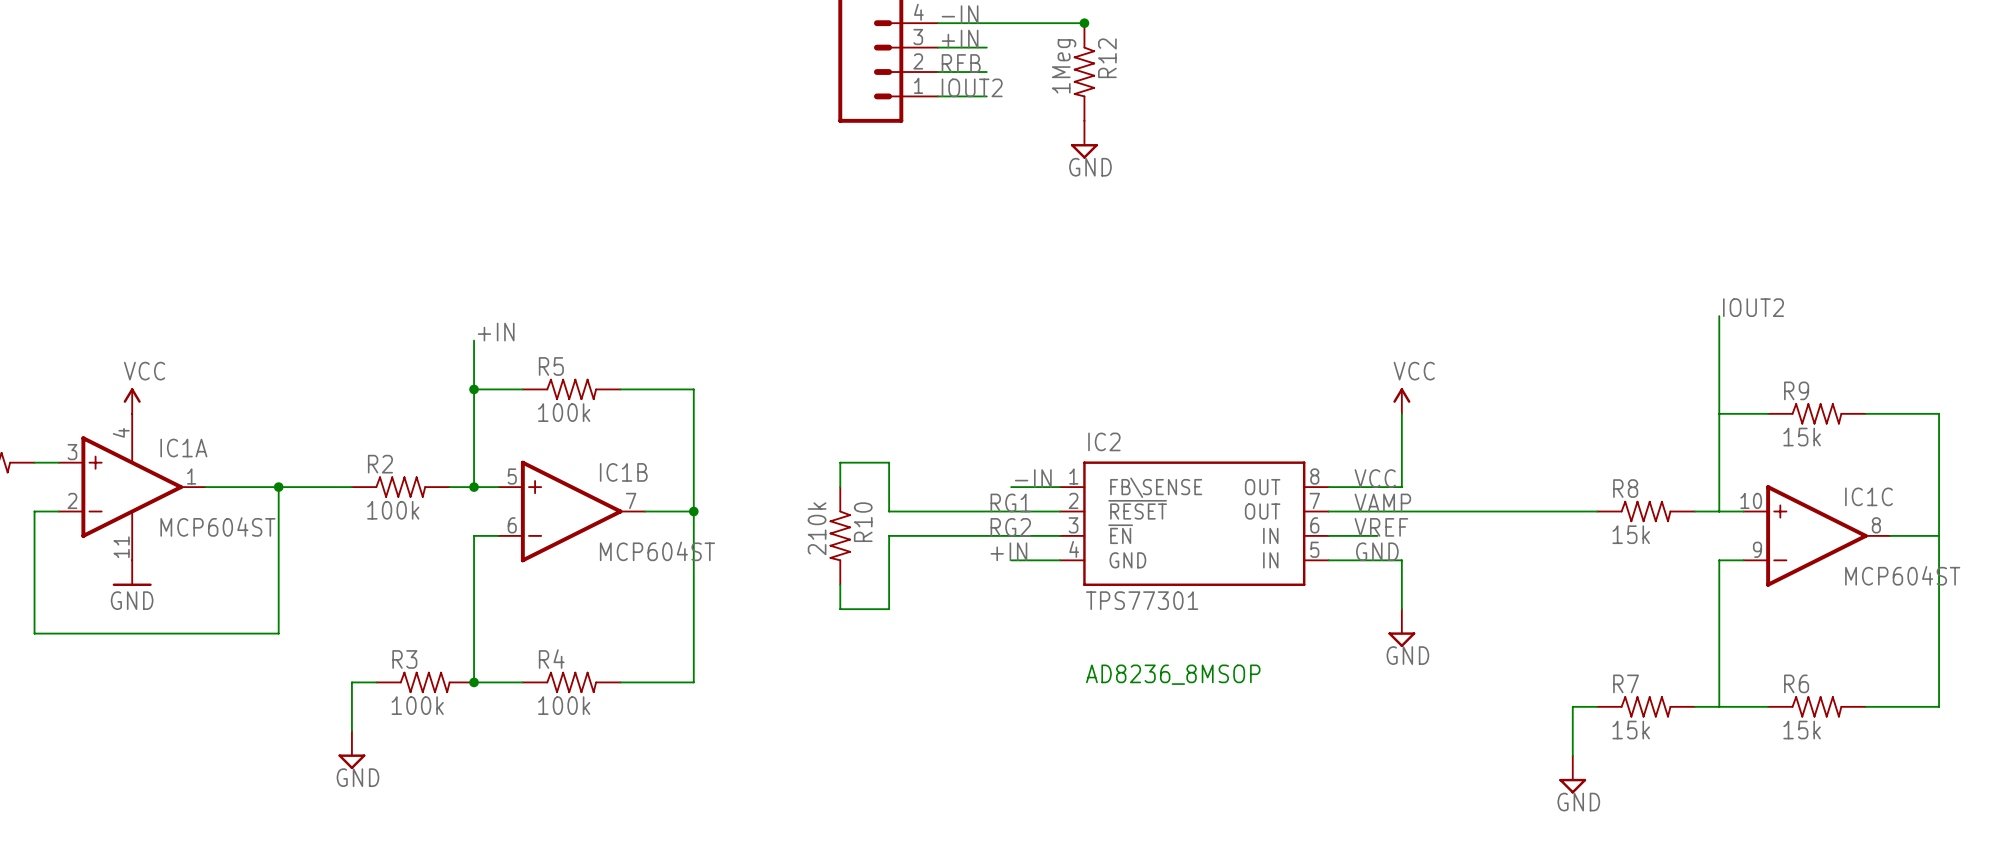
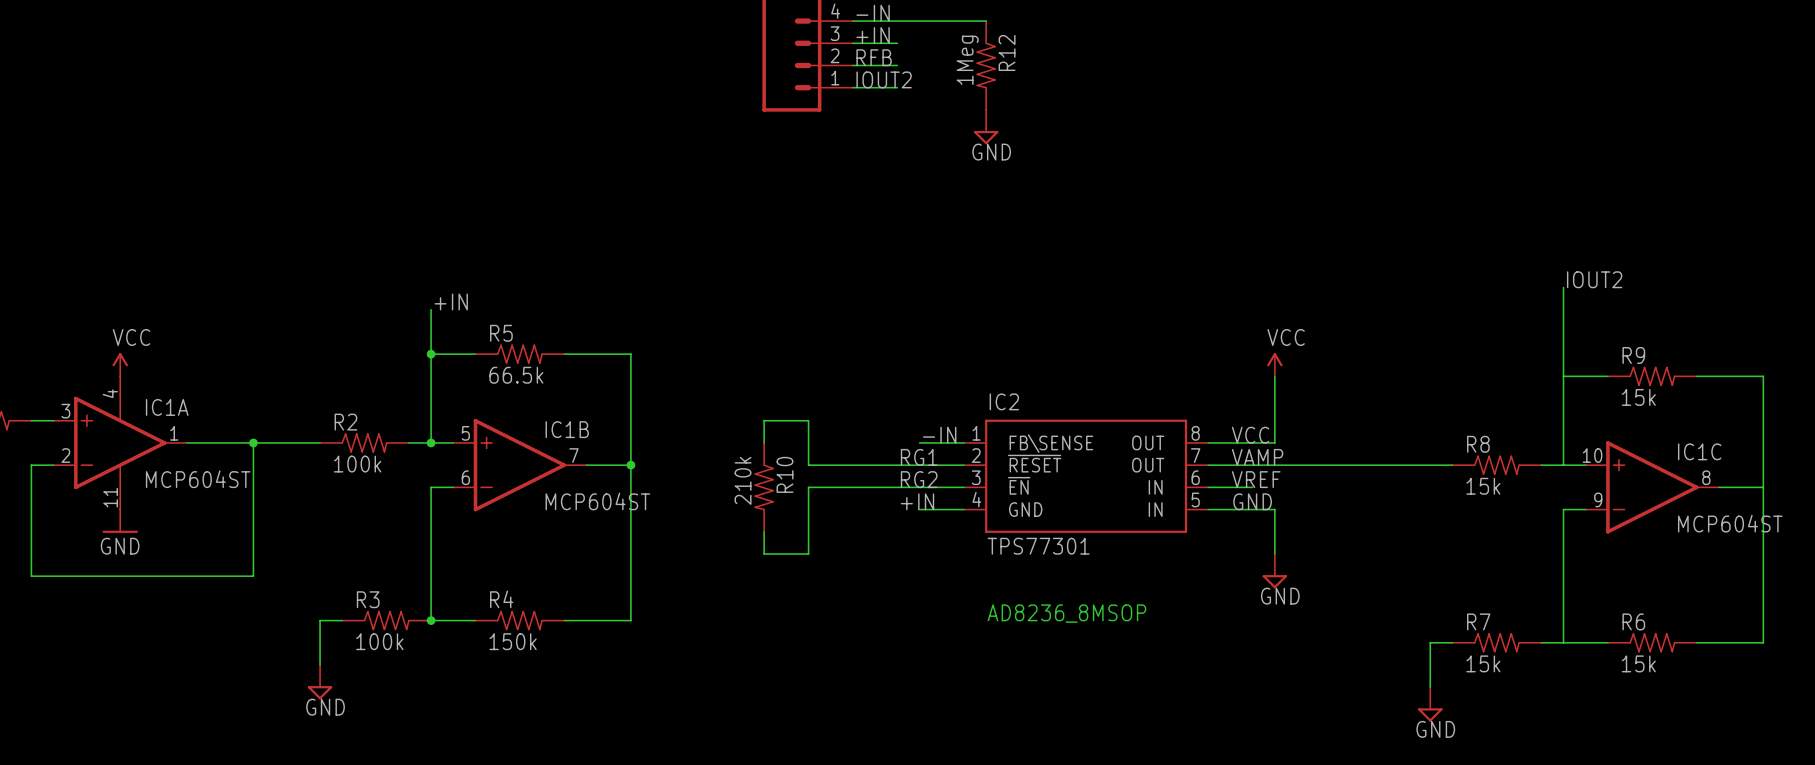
junction: (1084, 23) -> none
R5 value: 100k (564, 412) -> 66.5k (516, 375)
R4 value: 100k (564, 705) -> 150k (513, 641)

